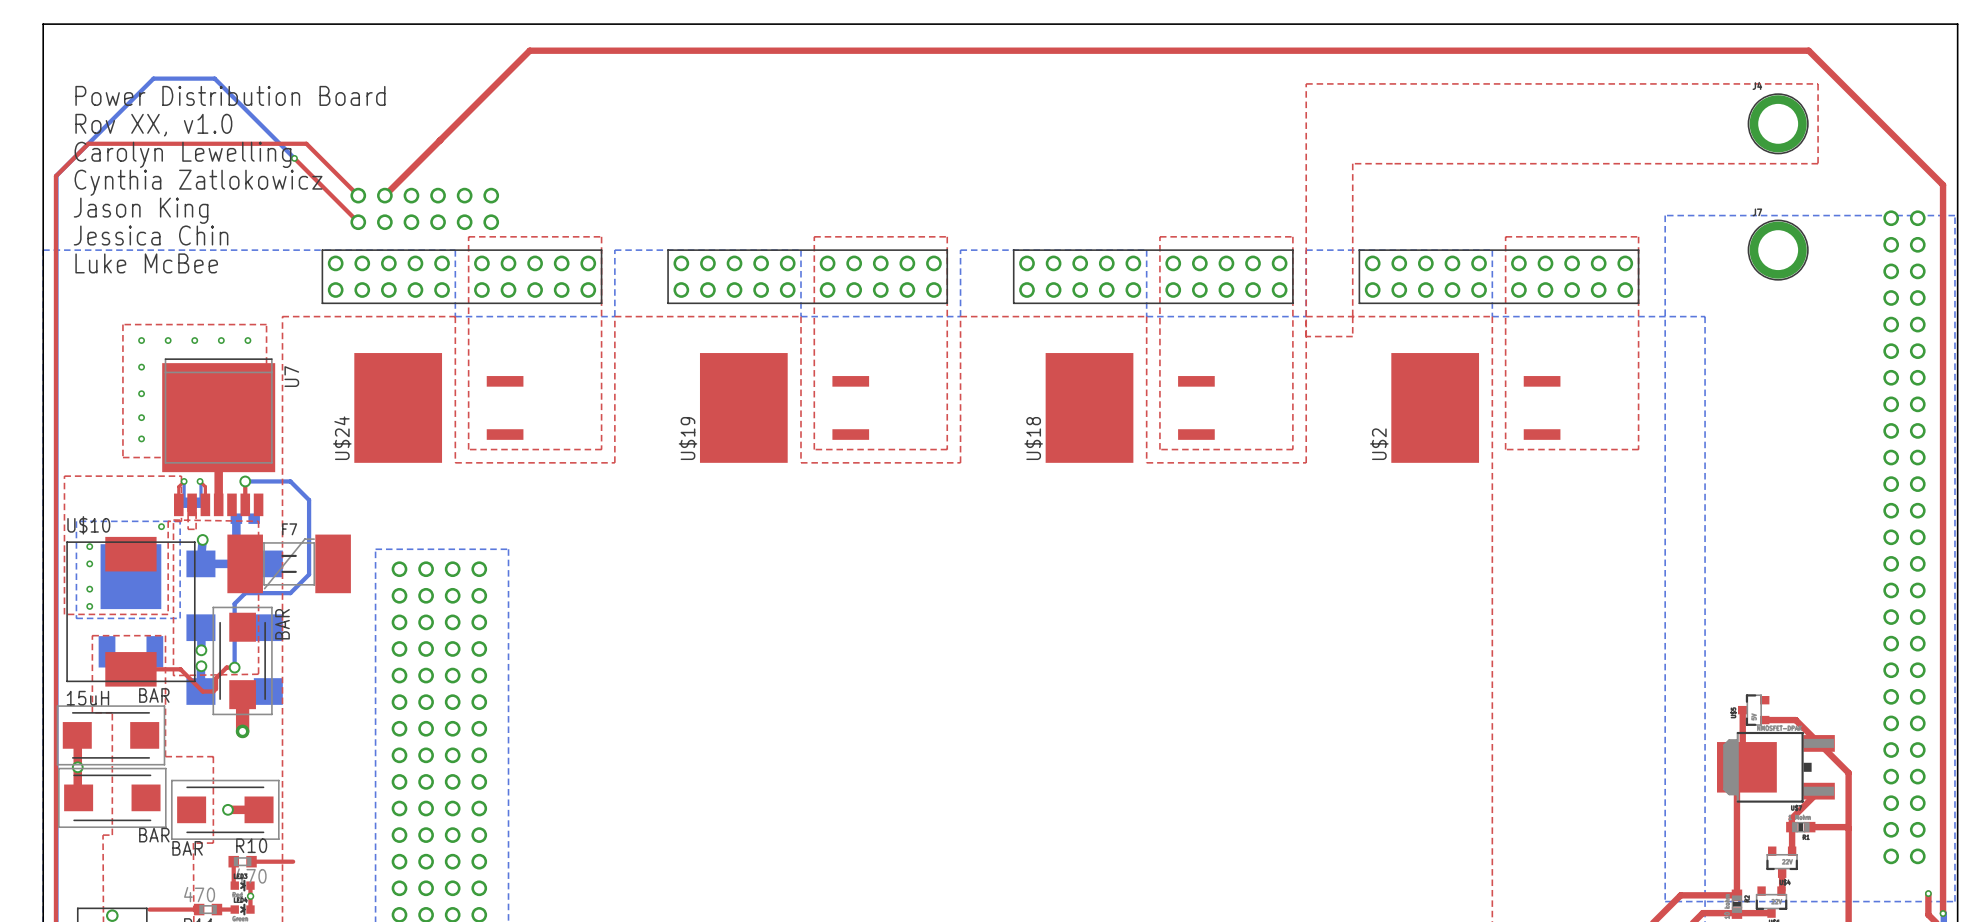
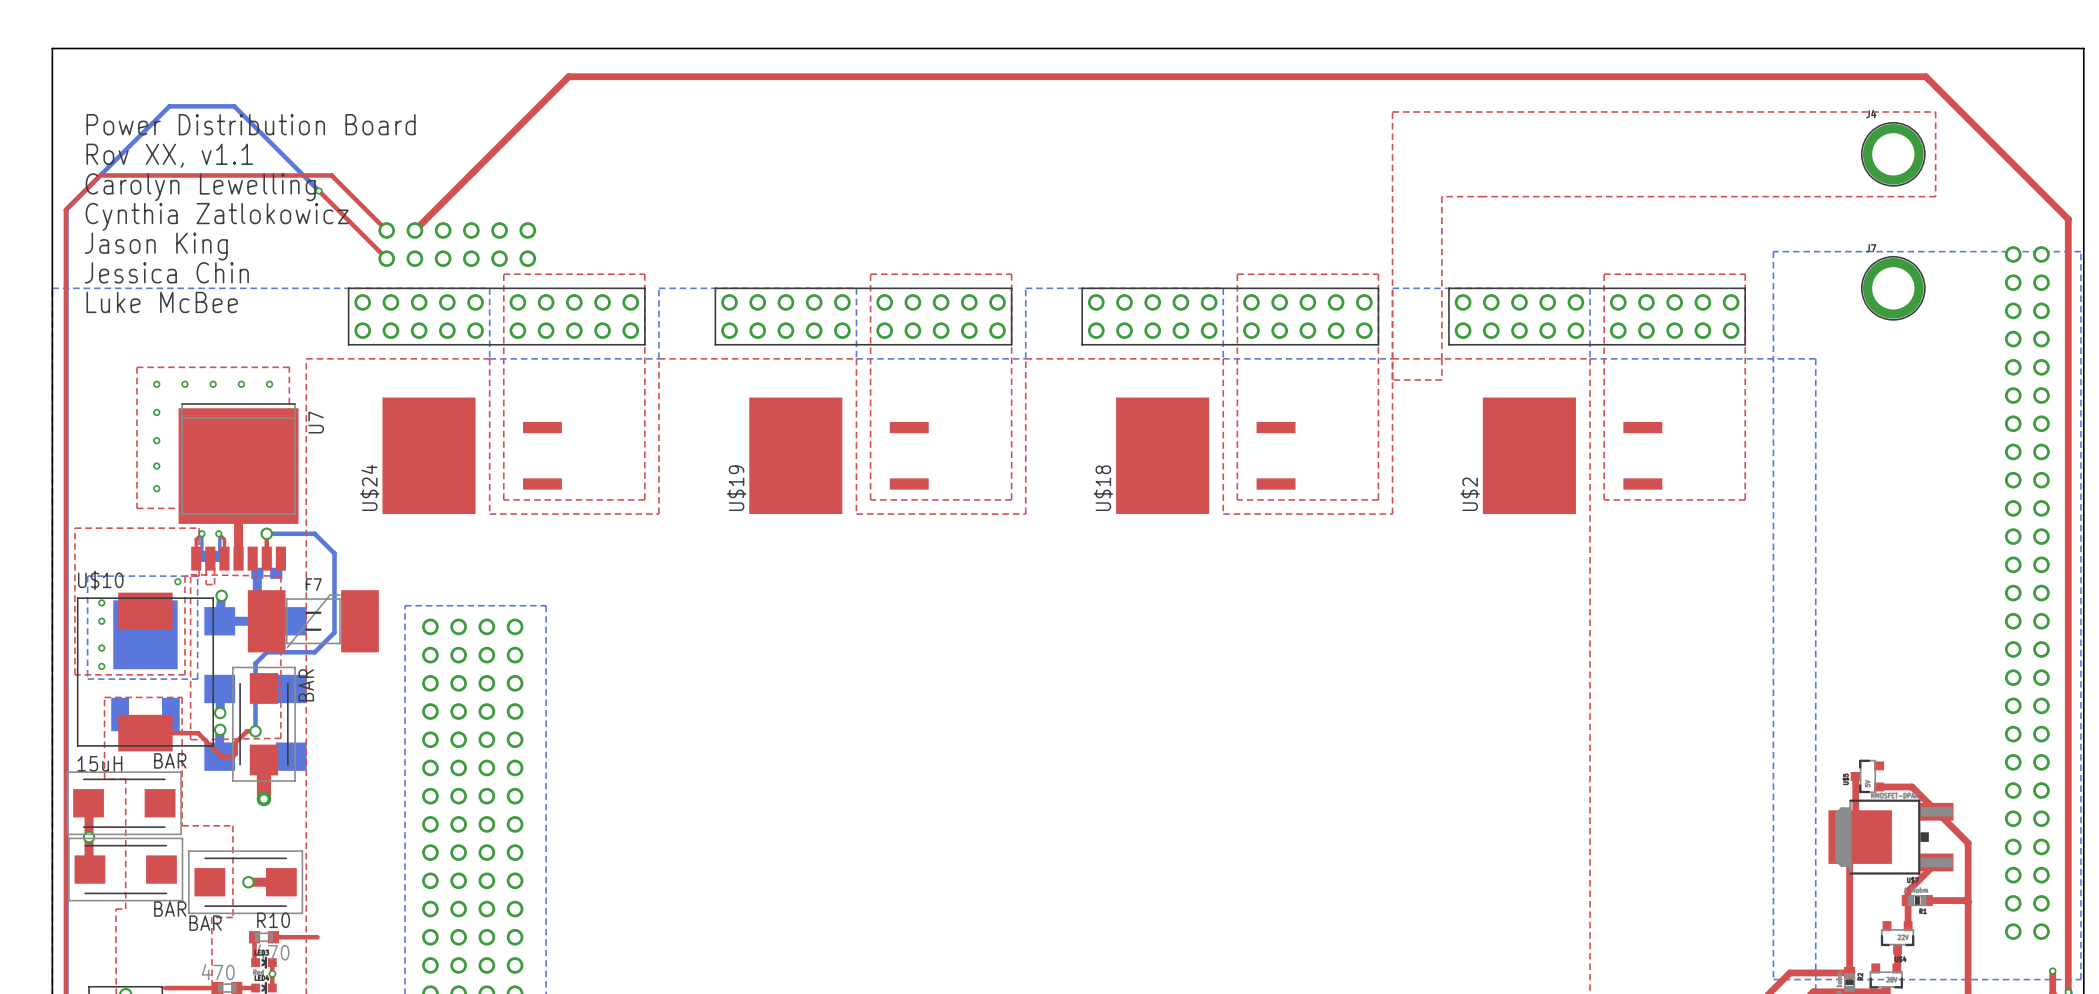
text: Rov XX, v1.0 (153, 125) -> Rov XX, v1.1 (169, 155)

